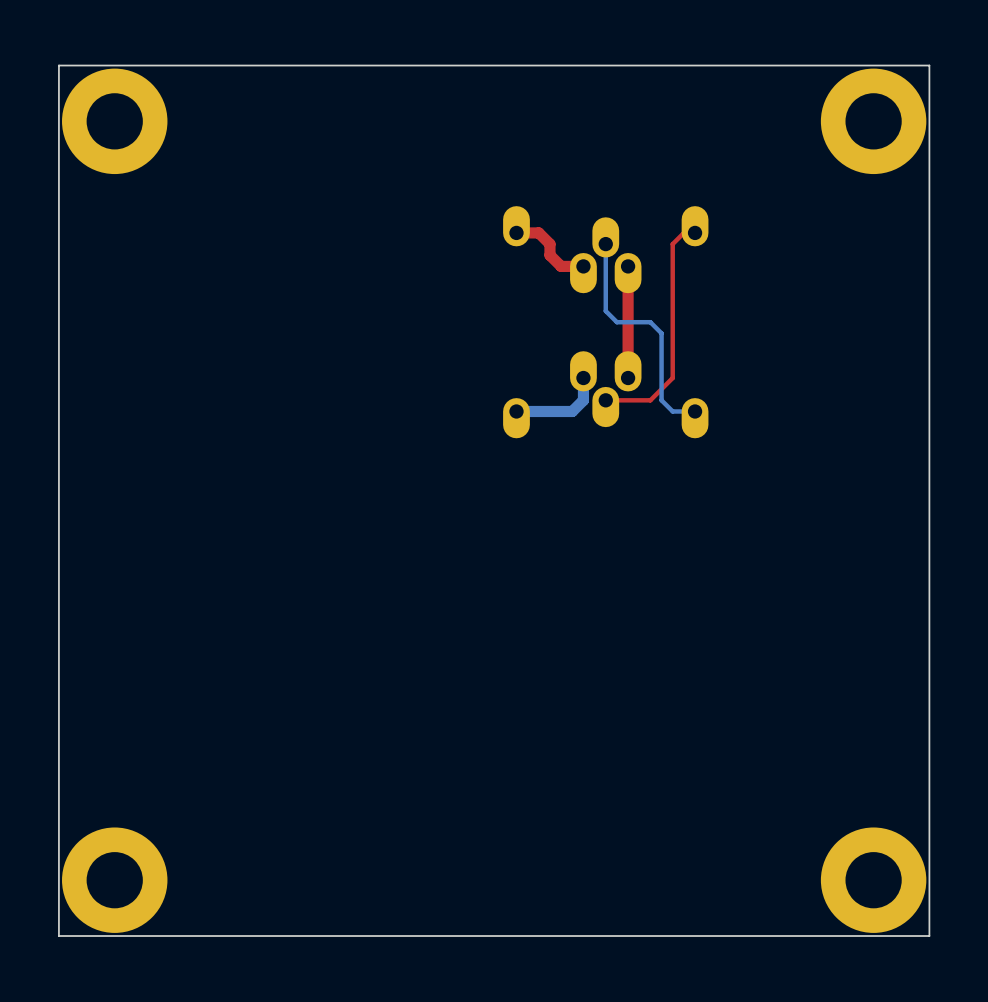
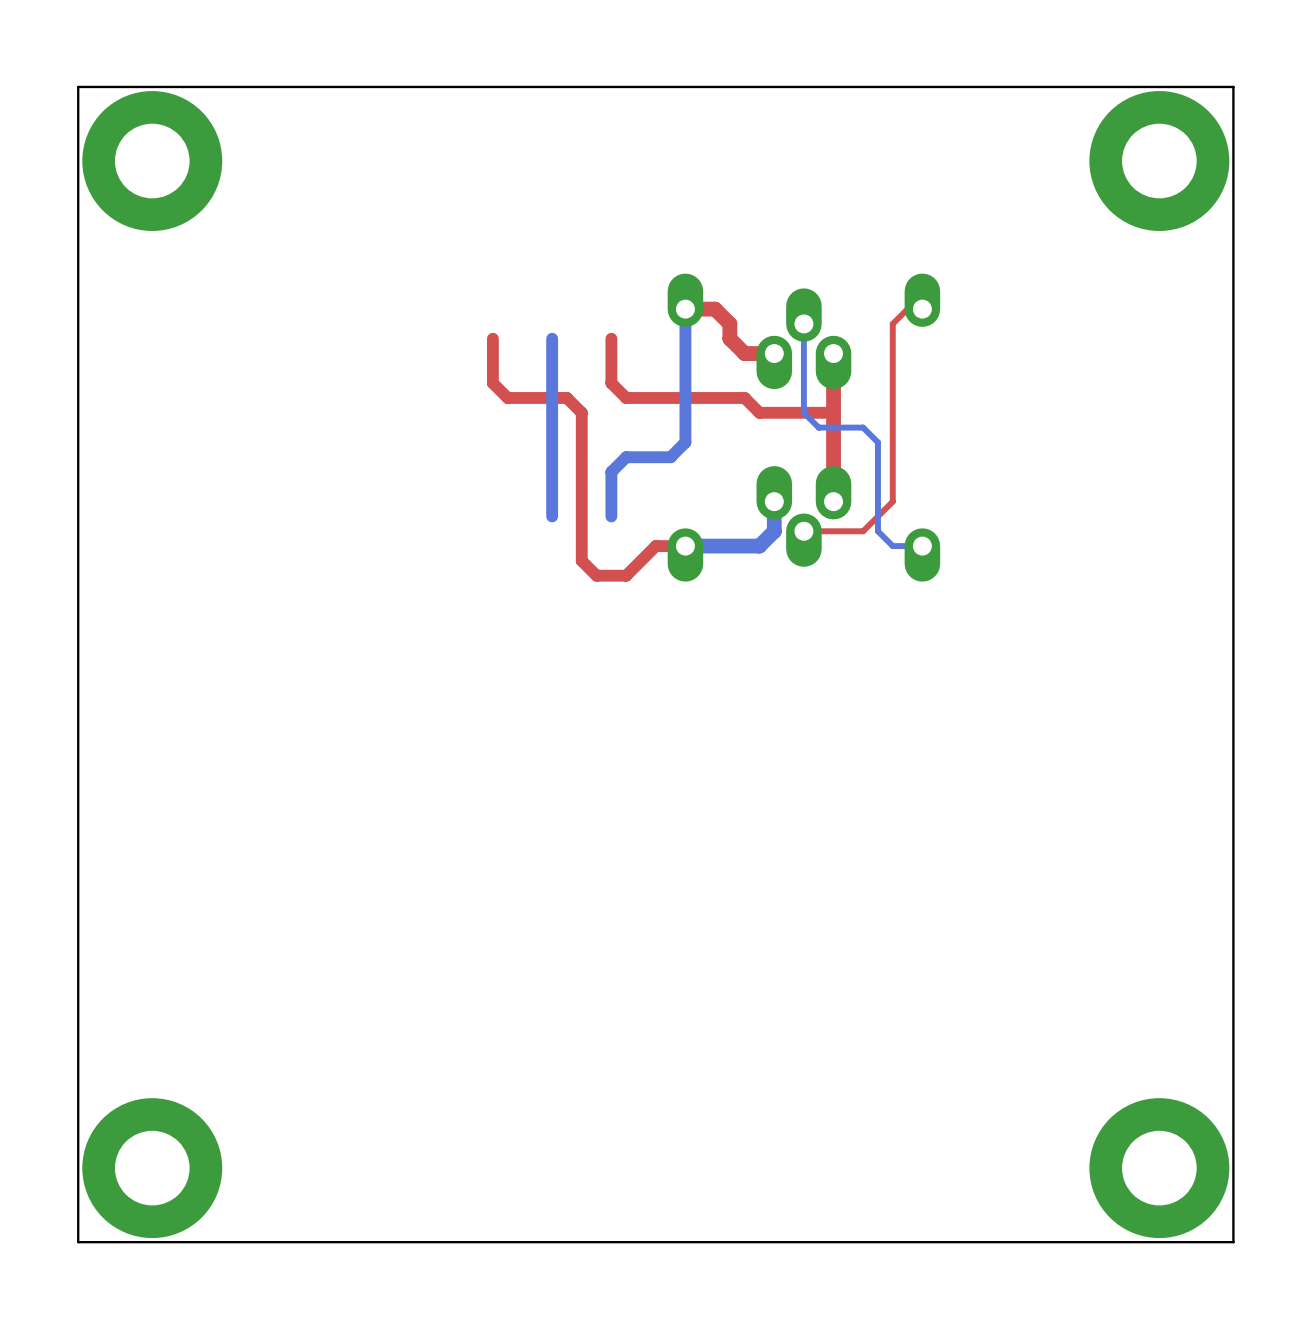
bottom track: none -> (685, 309) (685, 442) (670, 457) (626, 457) (611, 472) (611, 516)
top track: none -> (492, 338) (492, 383) (507, 397) (566, 397) (581, 412) (581, 560) (596, 575) (626, 575) (655, 546) (685, 546)
bottom track: none -> (552, 338) (552, 516)
top track: none -> (611, 338) (611, 383) (626, 397) (744, 397) (759, 412) (833, 412)

